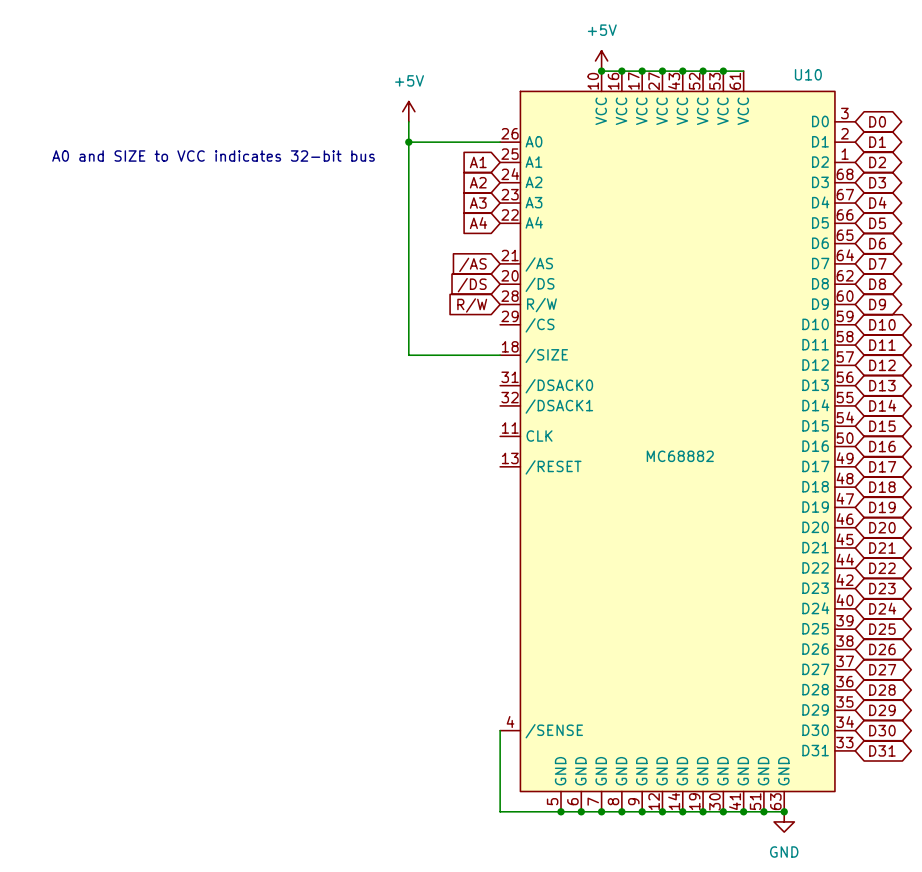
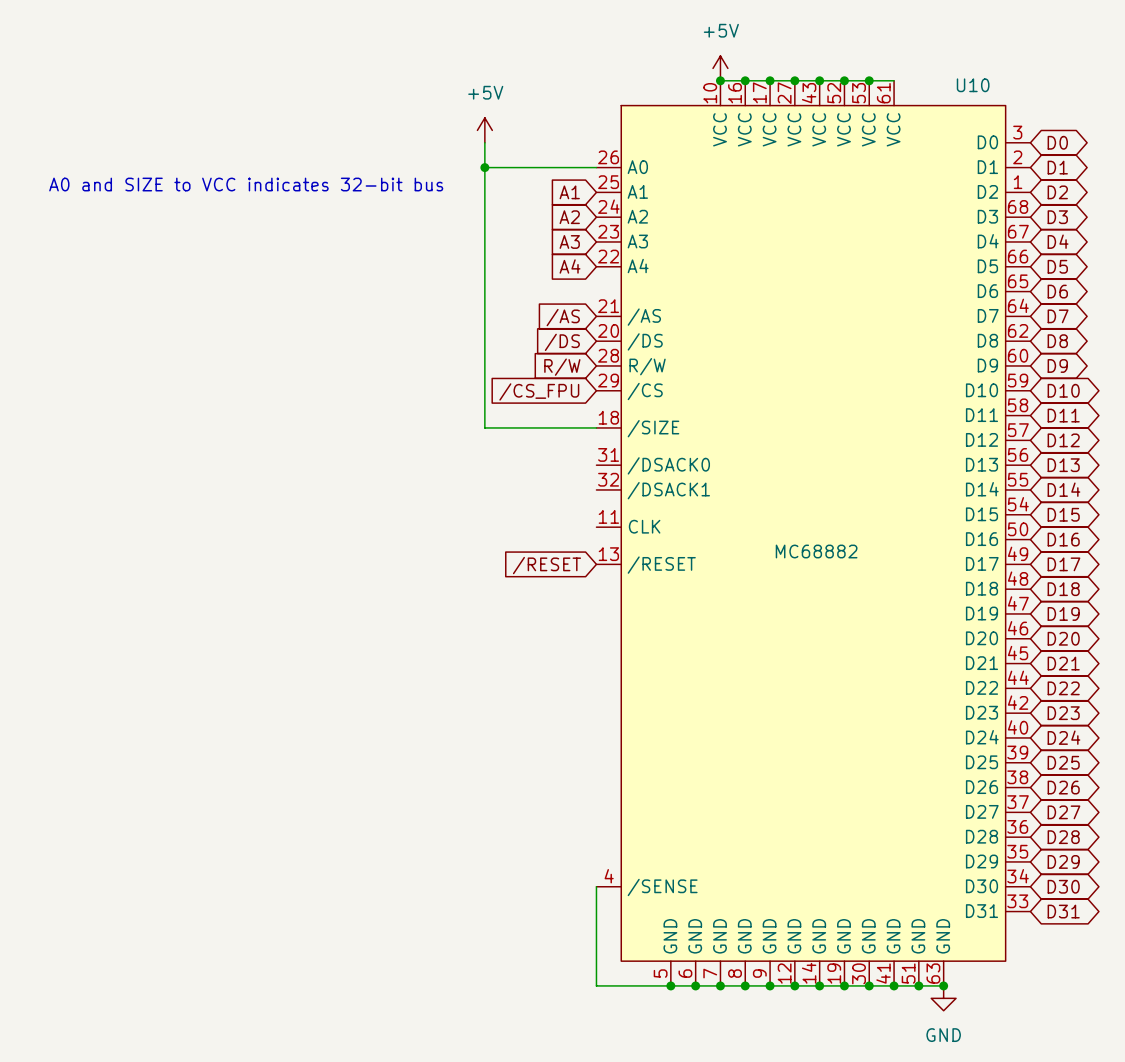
global label: none -> /CS_FPU (539, 391)
global label: none -> /RESET (546, 565)

